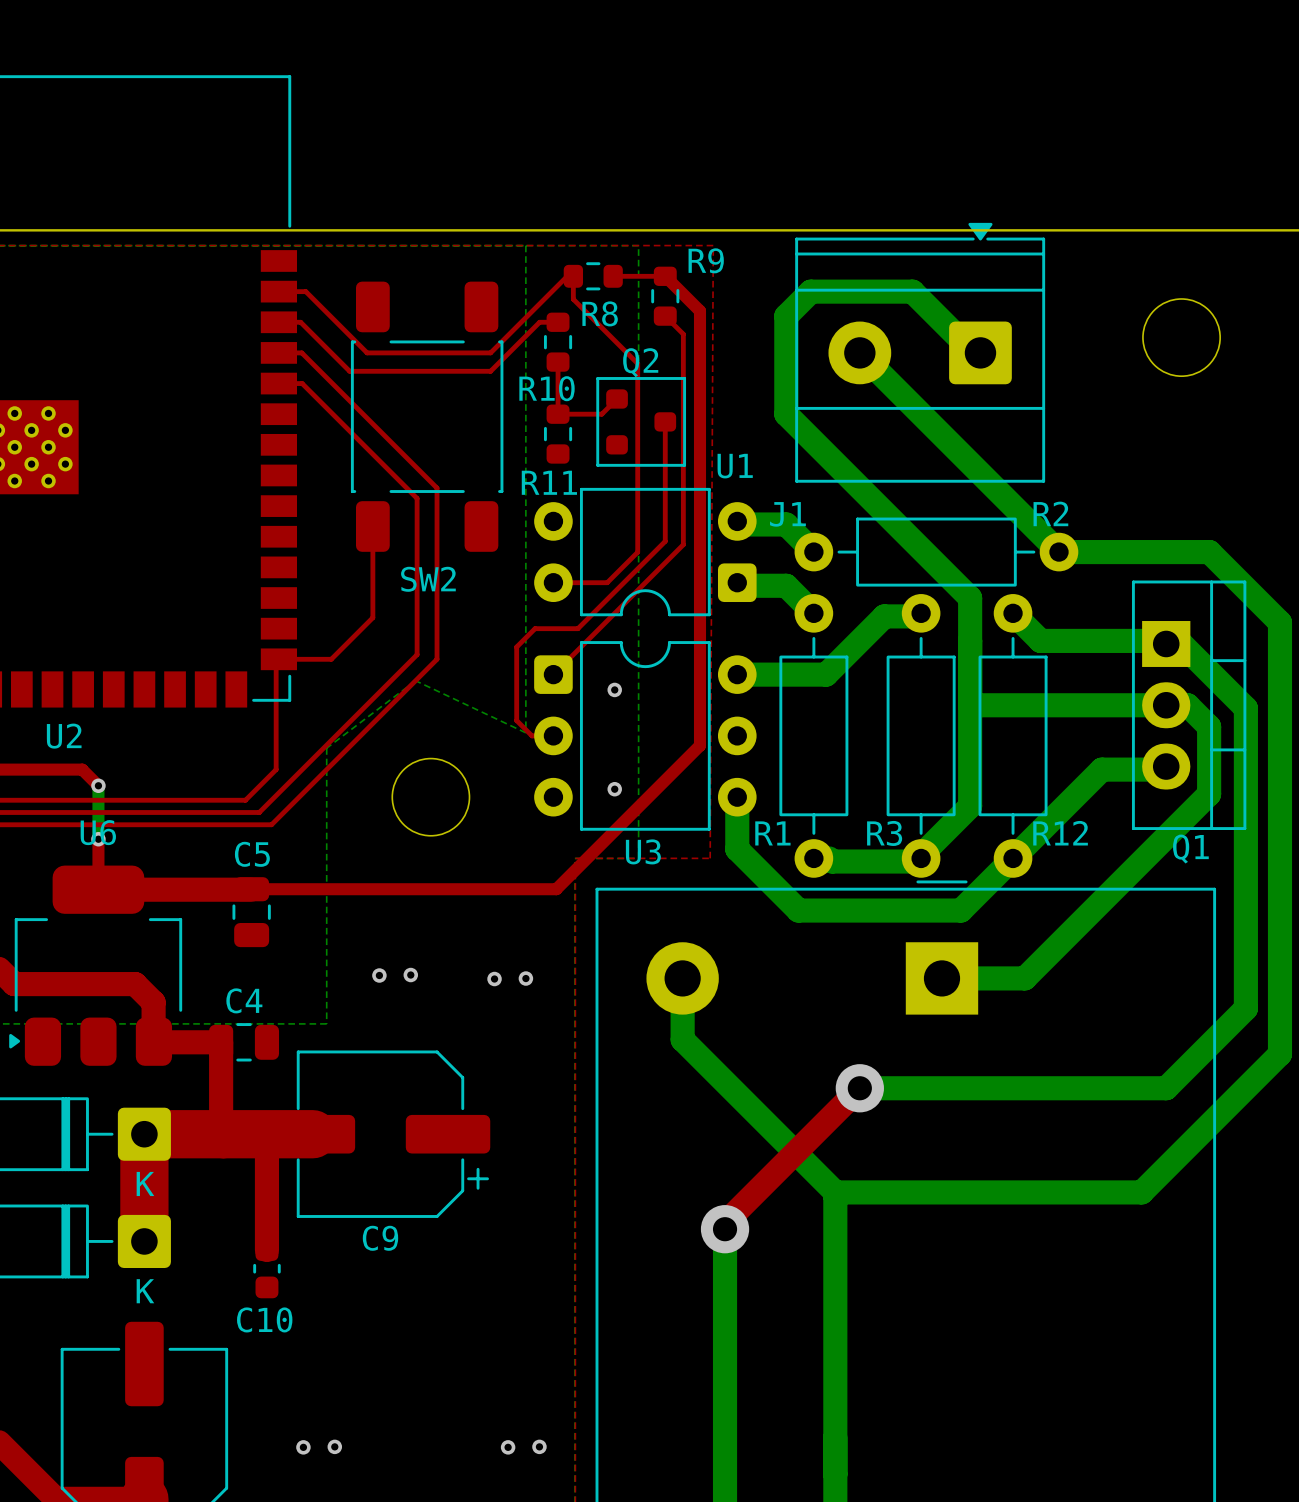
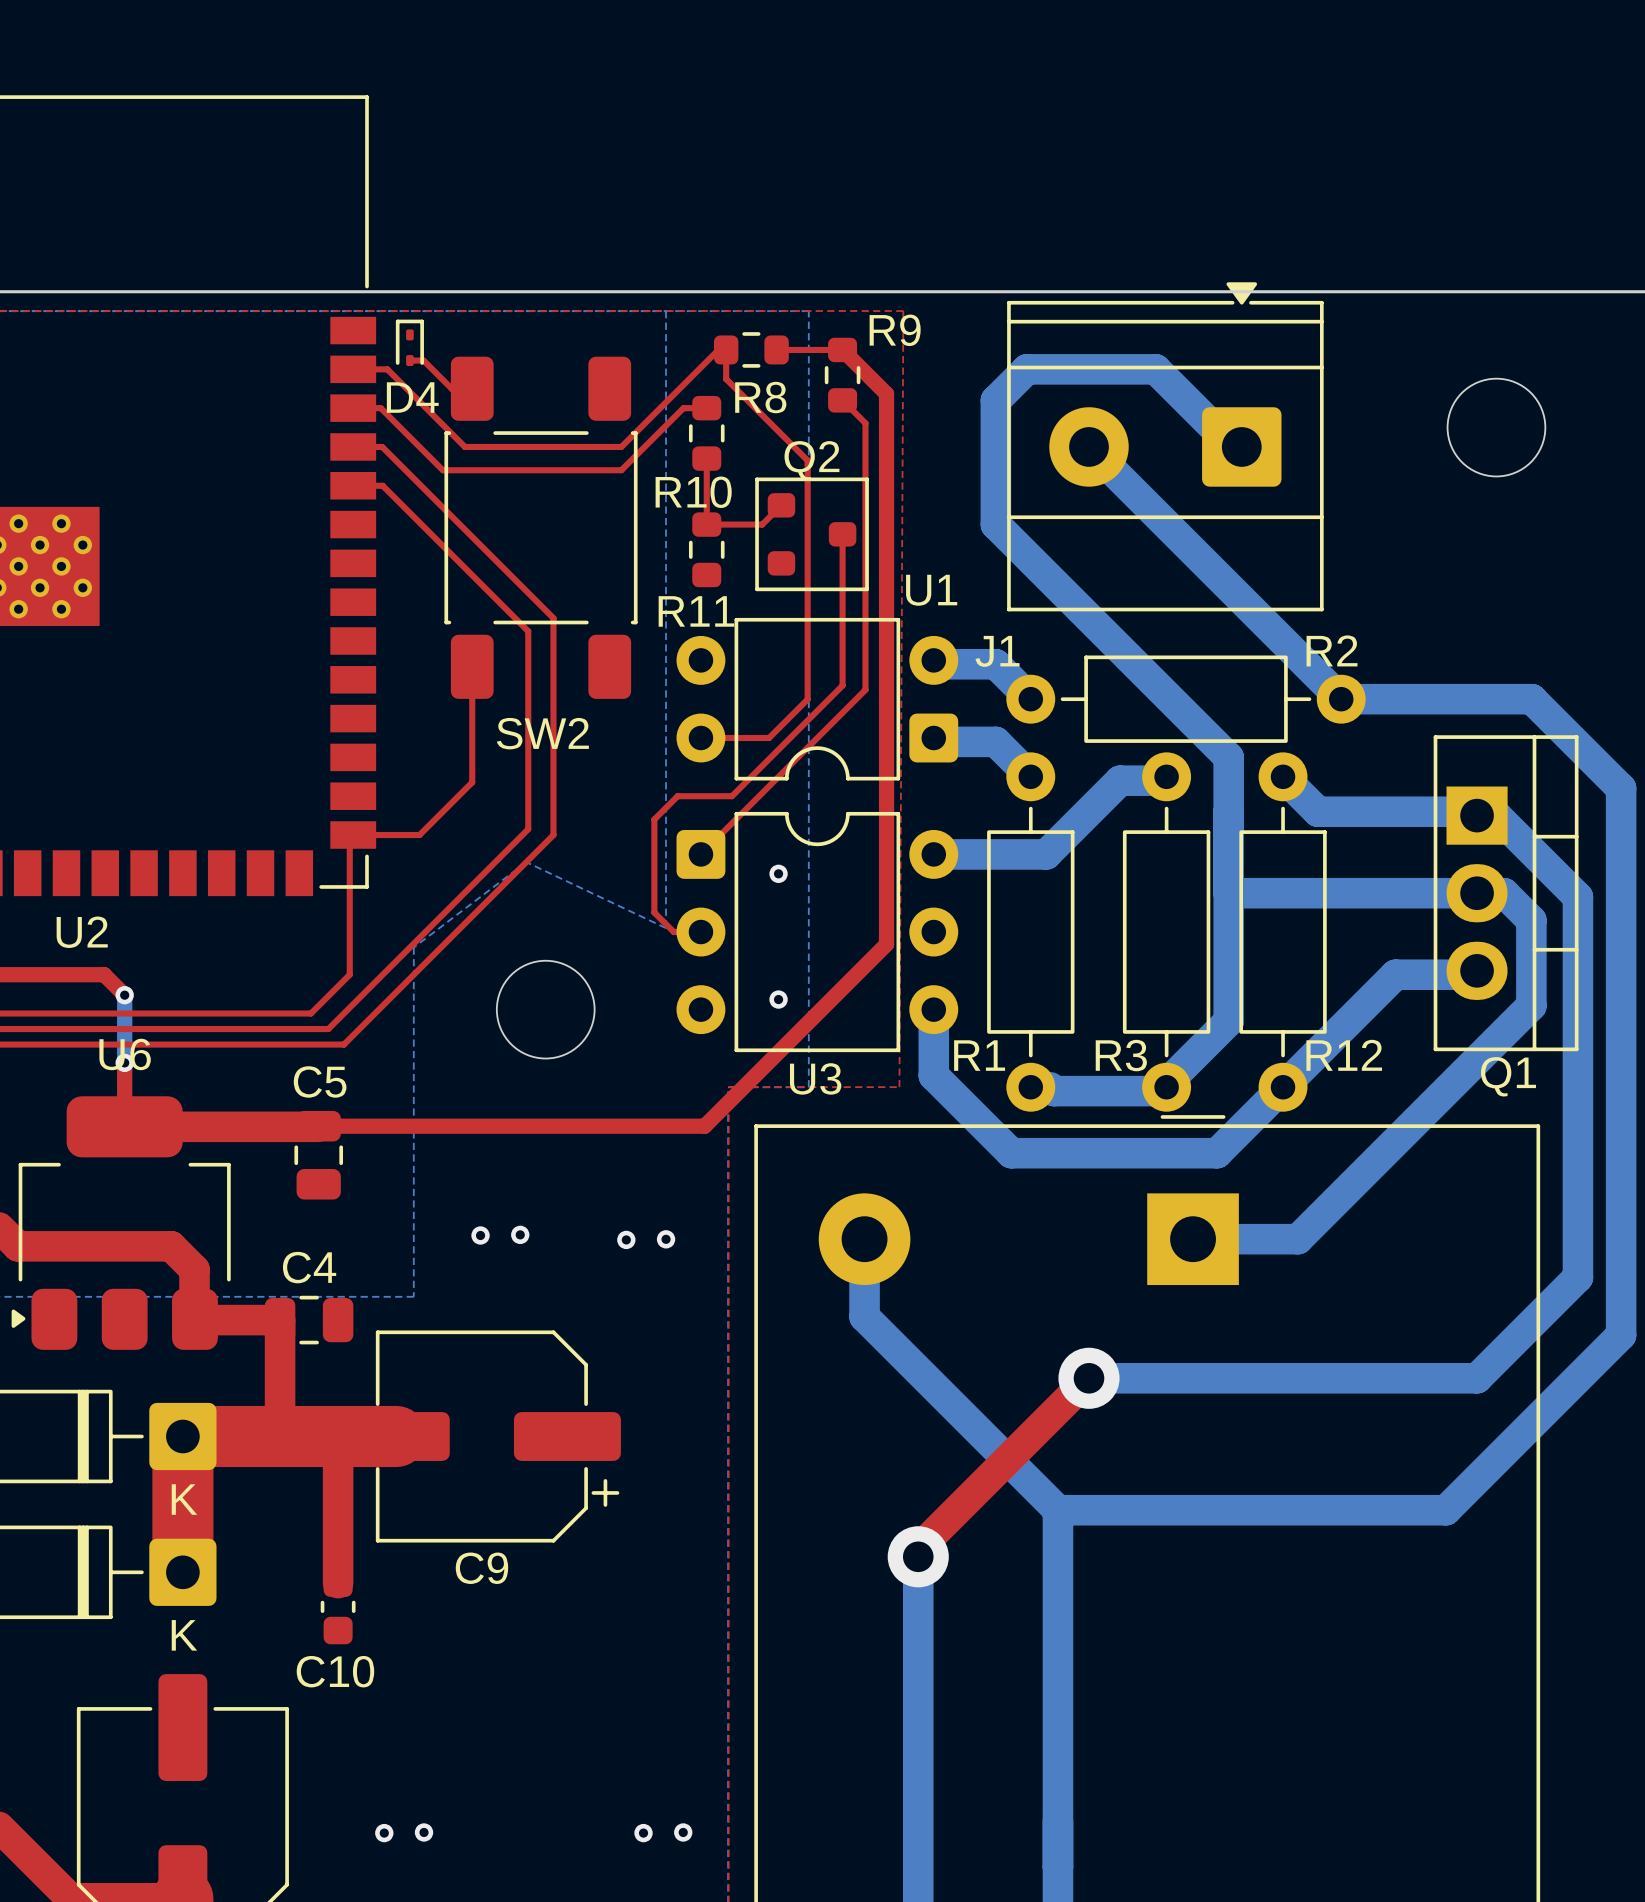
D4: none -> (409, 342)
top track: none -> (409, 360) (423, 360) (451, 388) (472, 388)

